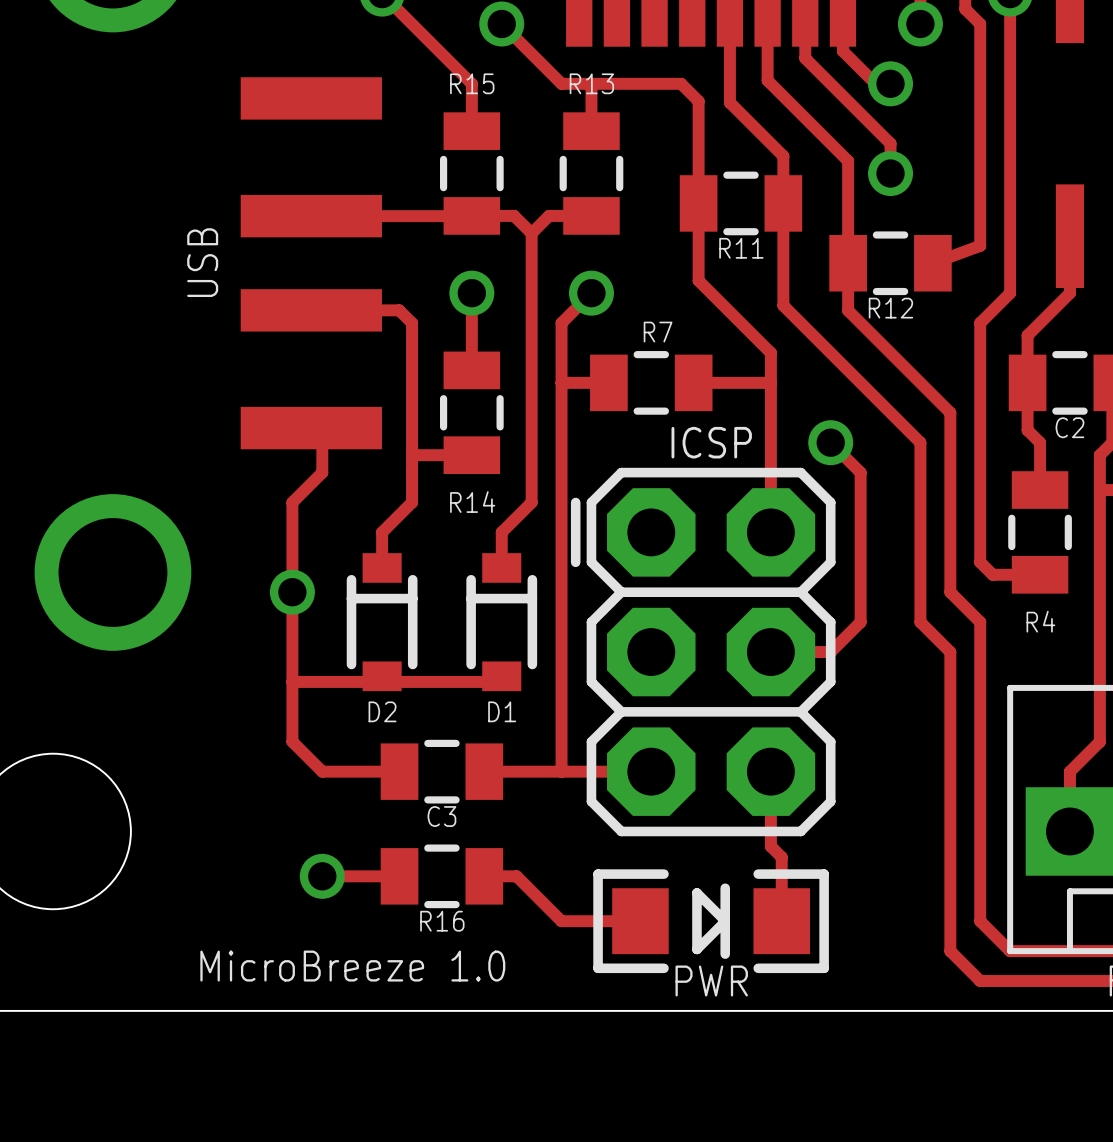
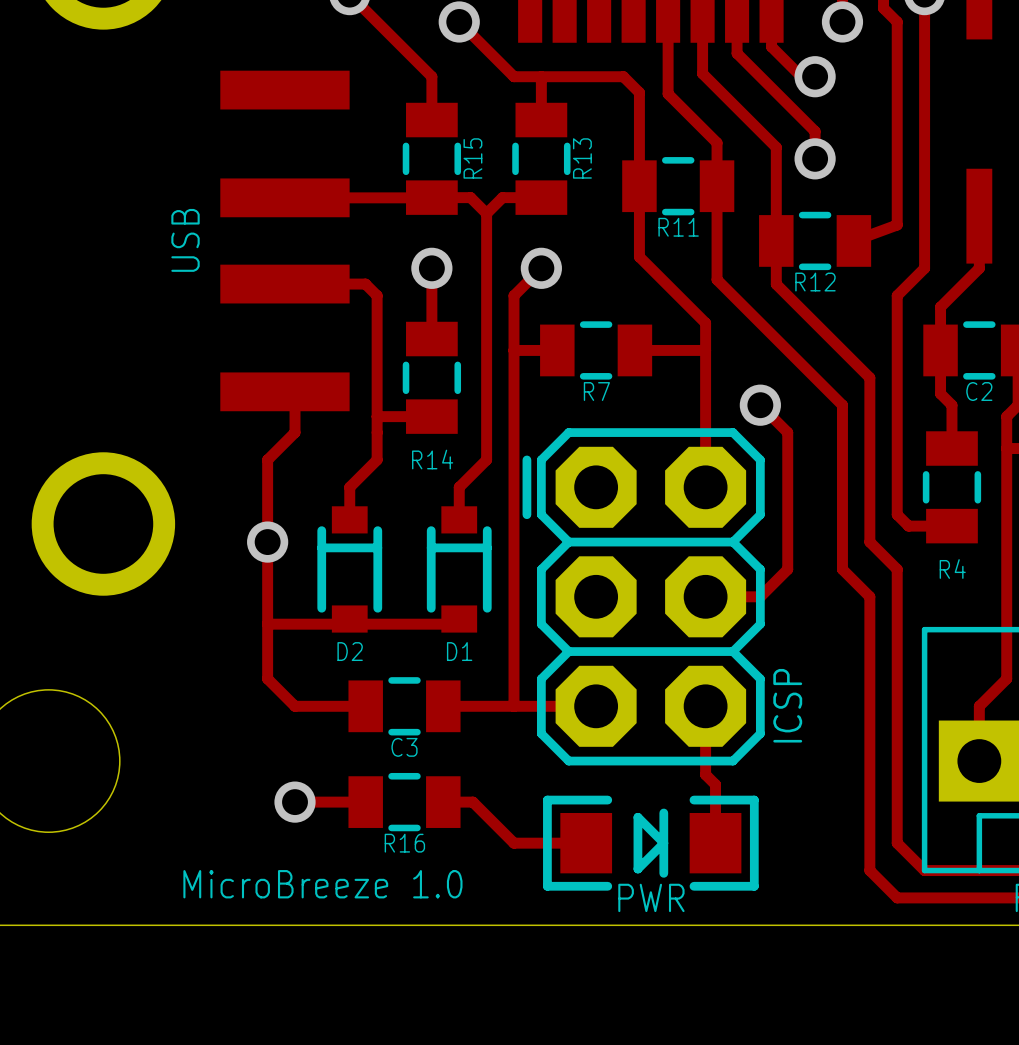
R15 name rotation: 0° (472, 83) -> 90° counterclockwise (472, 158)
R15 name position: R15 (472, 83) -> R15 (472, 158)
R13 name rotation: 0° (591, 83) -> 90° counterclockwise (582, 158)
R13 name position: R13 (591, 83) -> R13 (582, 158)
R7 name position: R7 (658, 332) -> R7 (596, 391)
ICSP name rotation: 0° (711, 442) -> 90° counterclockwise (787, 705)
ICSP name position: ICSP (711, 442) -> ICSP (787, 705)

